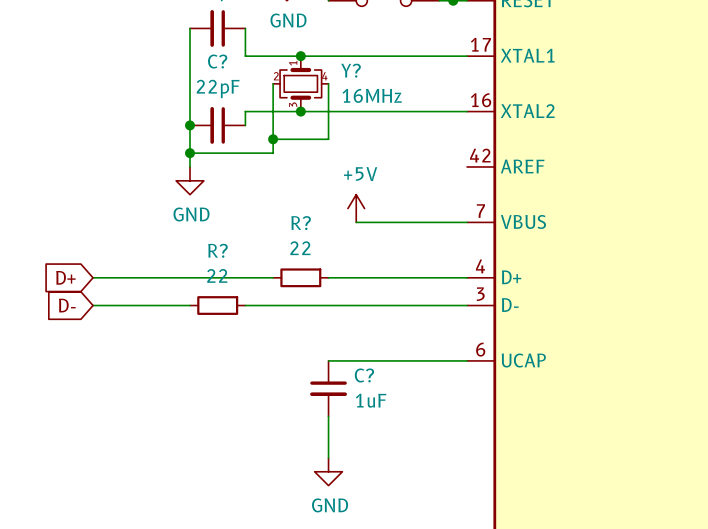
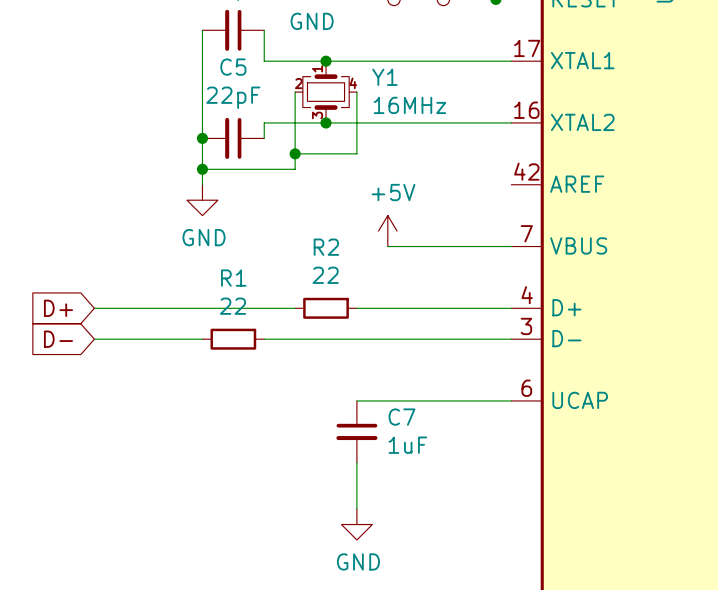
C? name: C? (217, 61) -> C5 (233, 67)
Y? name: Y? (351, 70) -> Y1 (384, 77)
R? name: R? (301, 223) -> R2 (326, 247)
R? name: R? (217, 250) -> R1 (233, 278)
C? name: C? (364, 375) -> C7 (401, 417)

